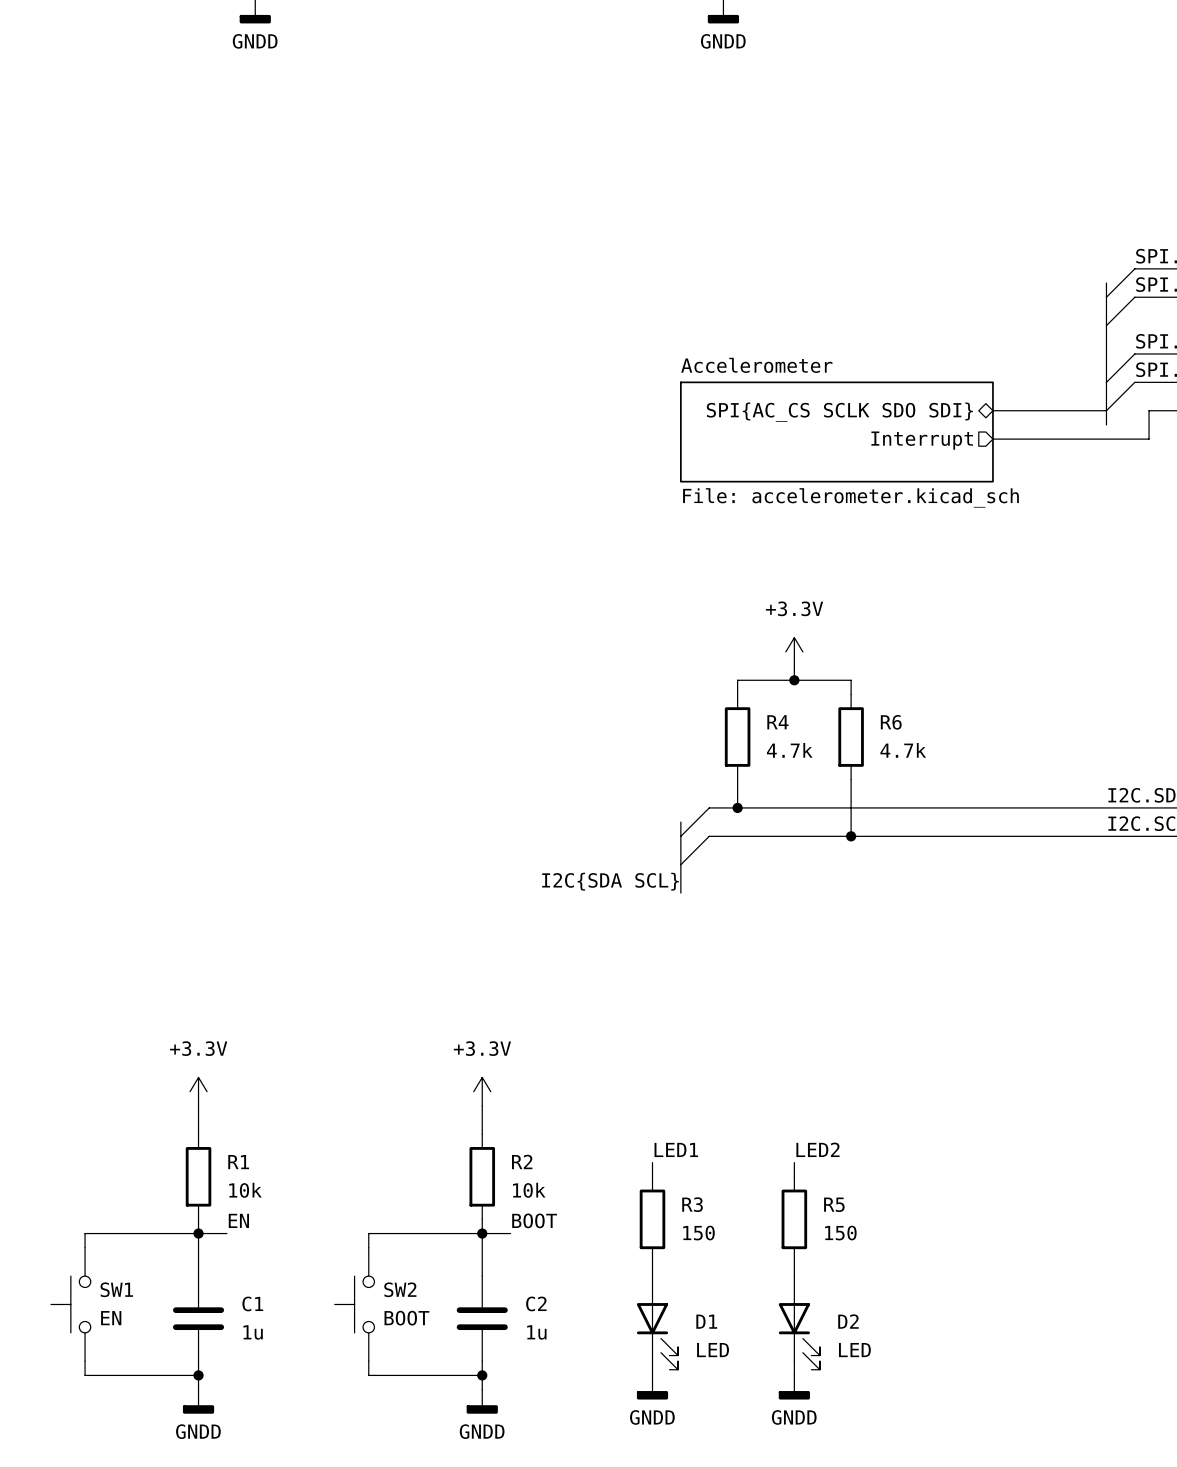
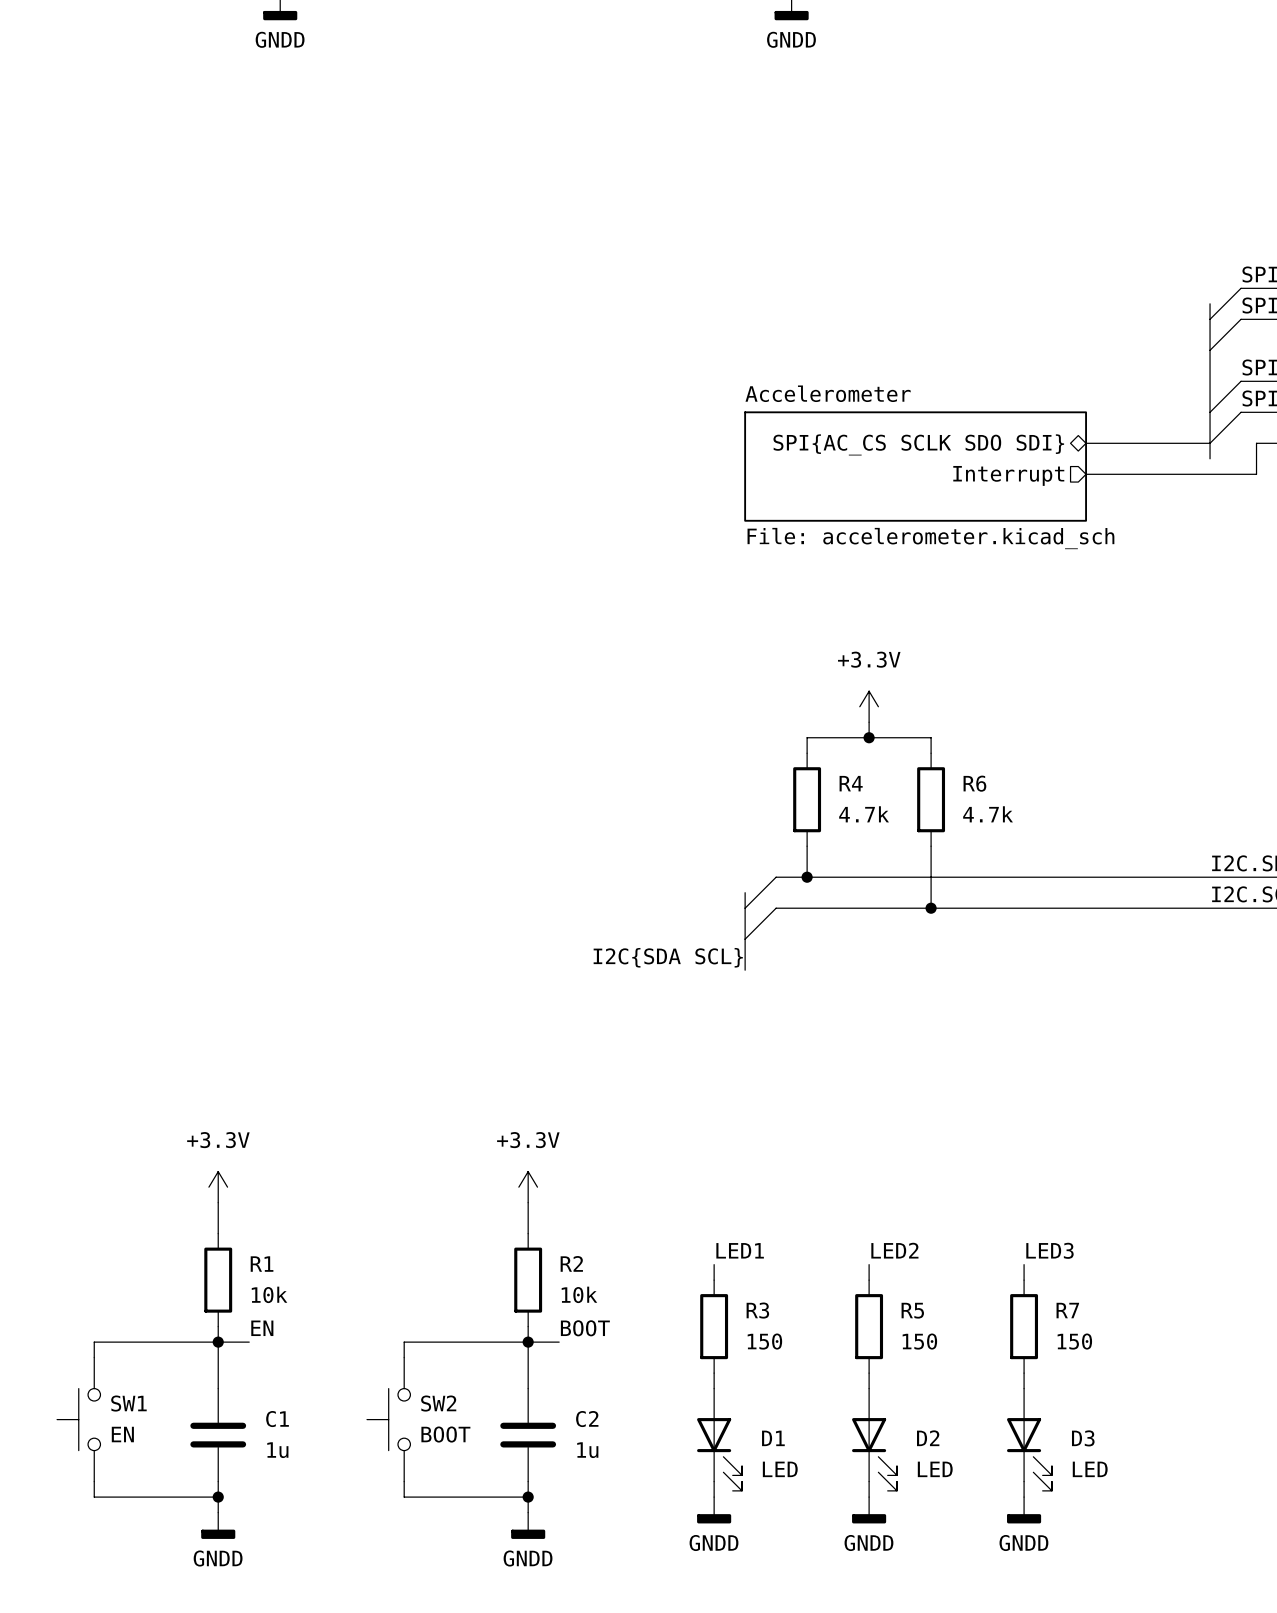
label: none -> LED3 (1049, 1250)
wire: none -> (1024, 1264) (1024, 1280)
R7: none -> 150 (1024, 1326)
wire: none -> (1024, 1373) (1024, 1388)
D3: none -> LED (1029, 1439)
wire: none -> (1024, 1481) (1024, 1497)
power symbol: none -> GNDD (1024, 1510)

